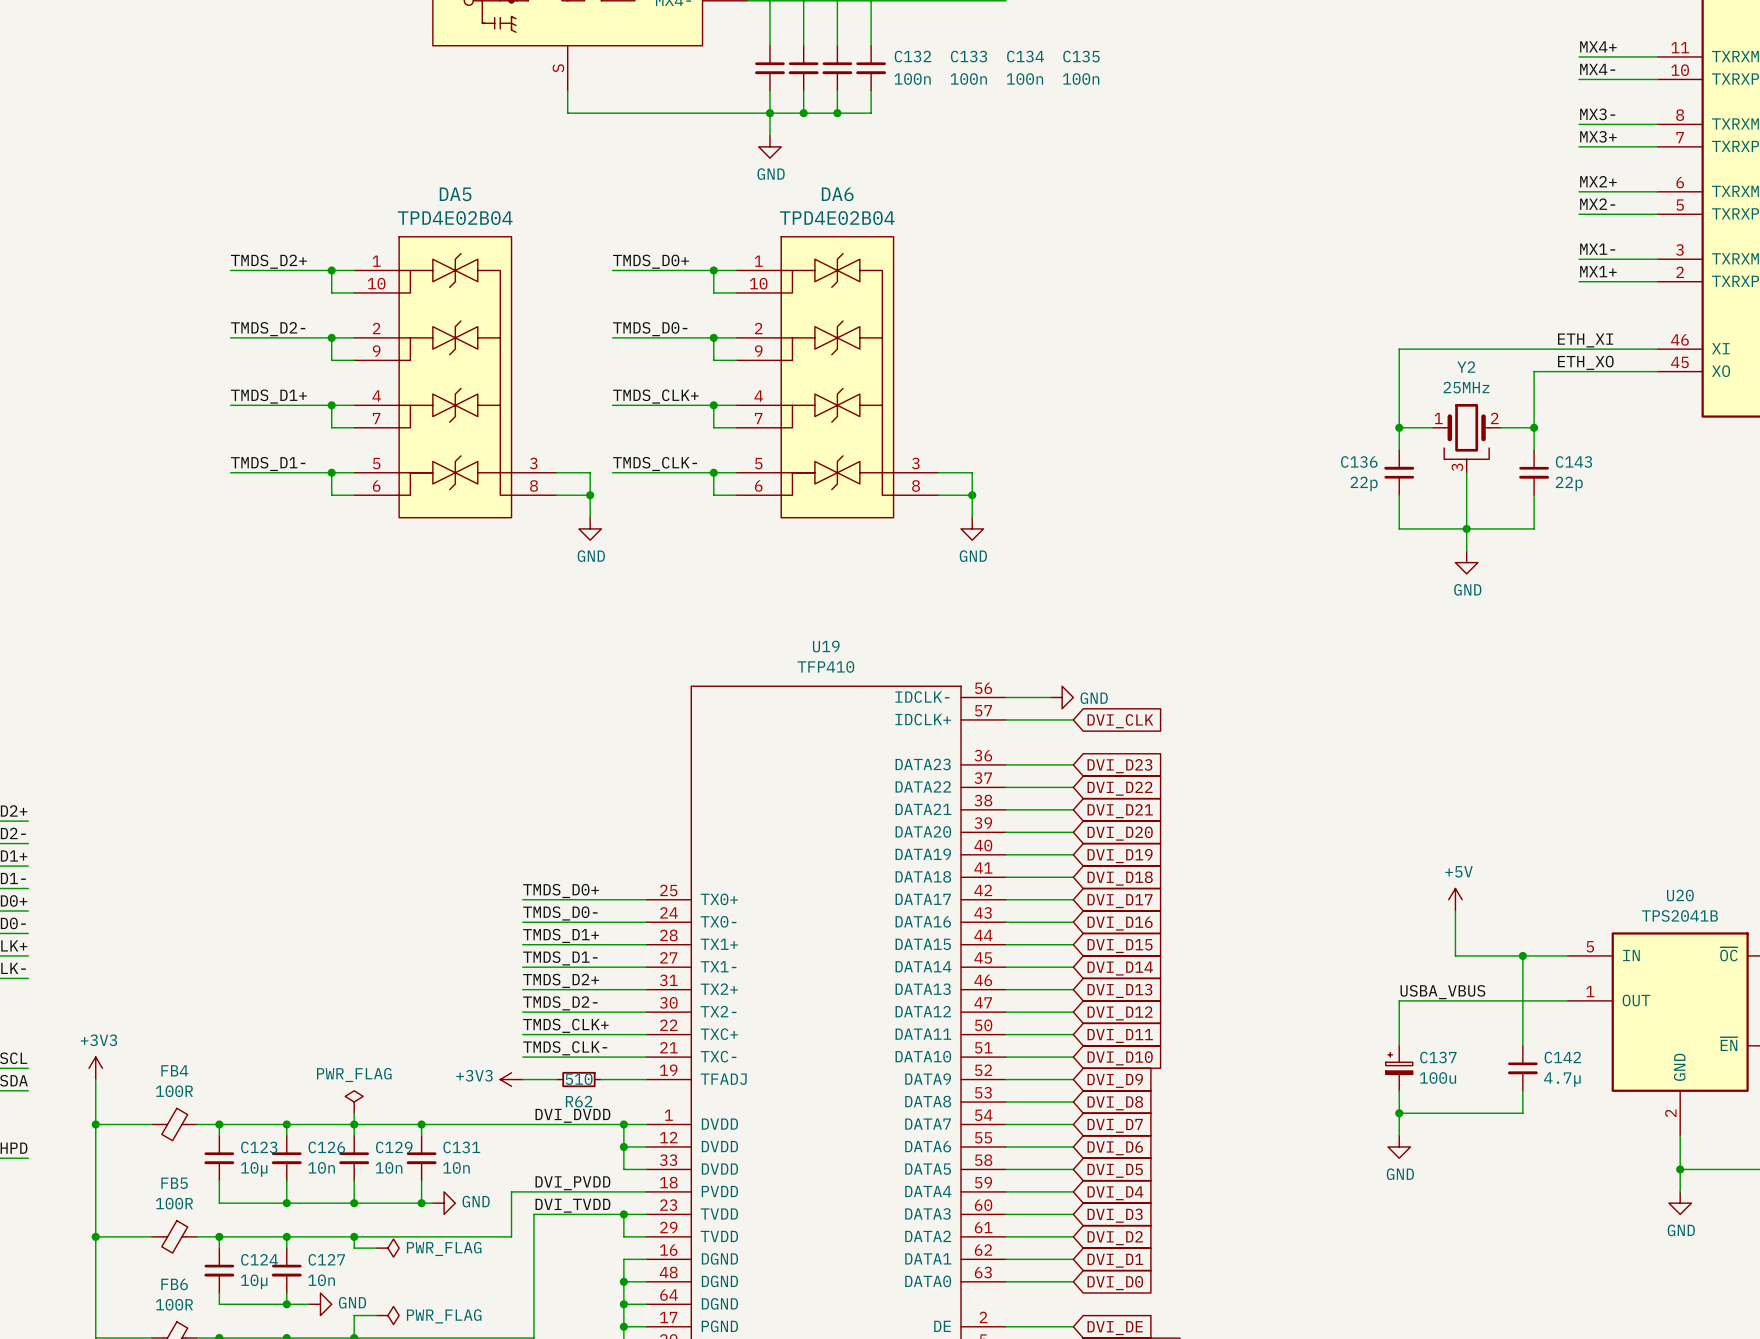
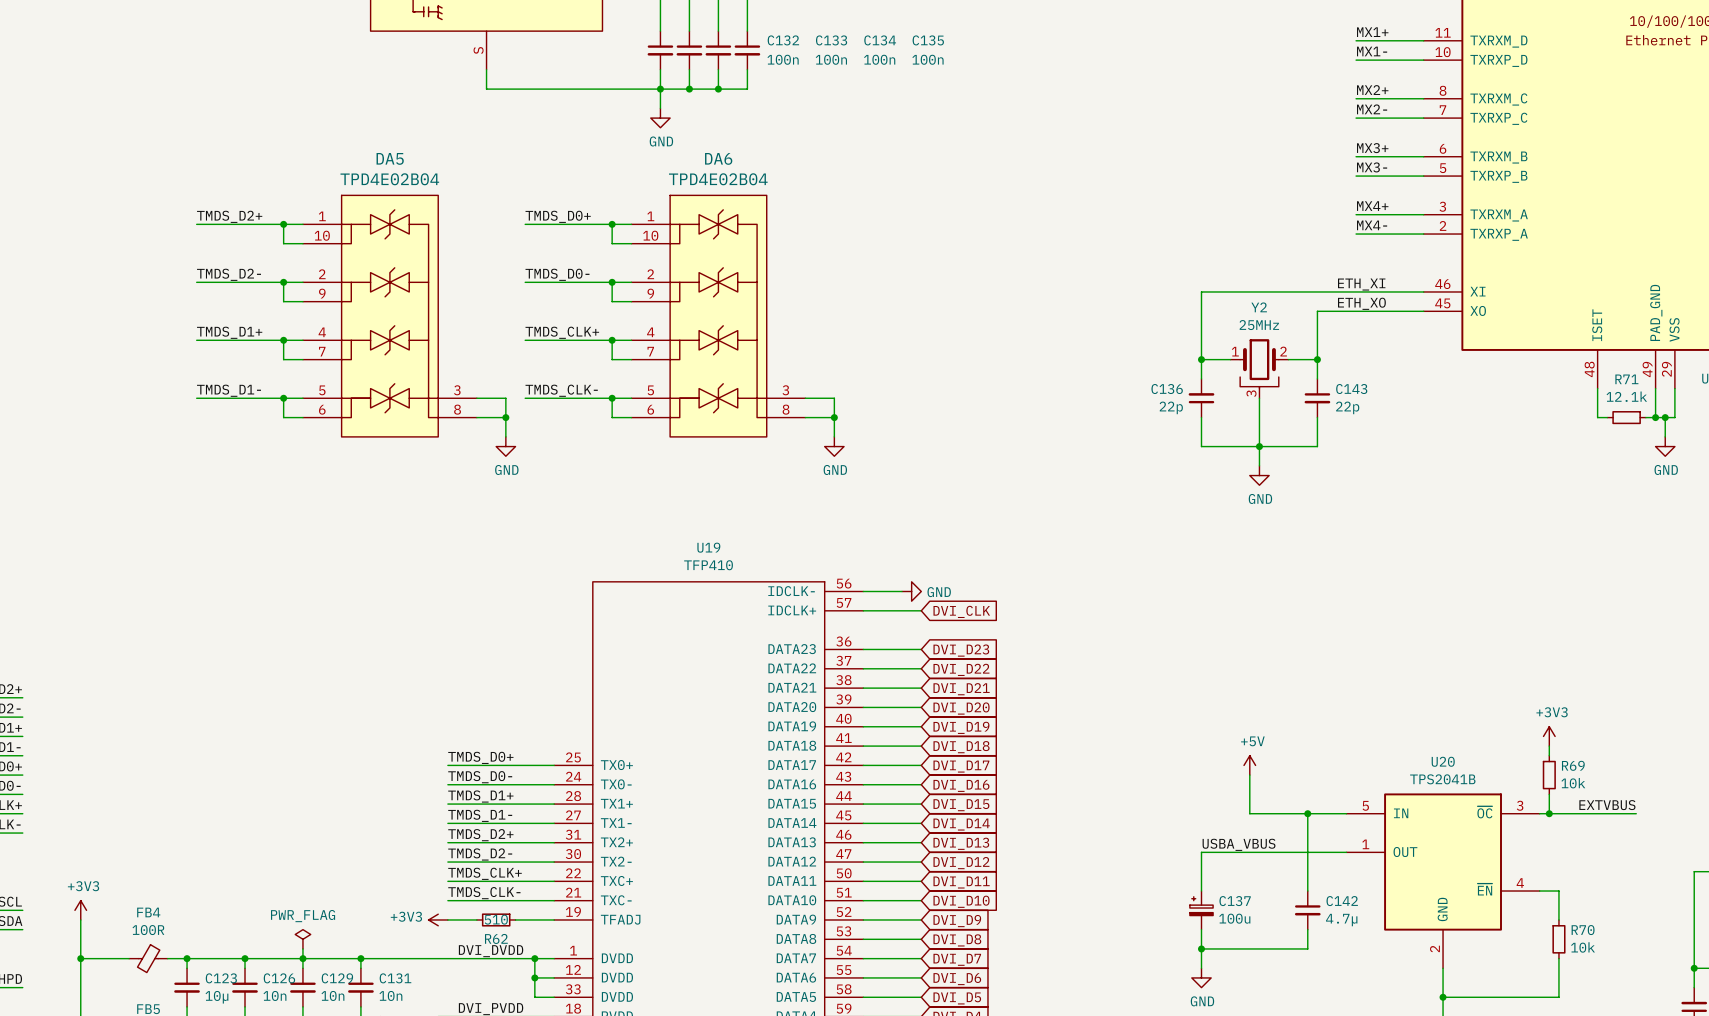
label: MX4+ (1598, 46) -> MX1+ (1372, 32)
label: MX4- (1597, 69) -> MX1- (1372, 51)
label: MX3- (1597, 114) -> MX2+ (1372, 90)
label: MX3+ (1598, 136) -> MX2- (1372, 109)
label: MX2+ (1598, 181) -> MX3+ (1372, 148)
label: MX2- (1597, 204) -> MX3- (1372, 167)
label: MX1- (1597, 249) -> MX4+ (1372, 206)
label: MX1+ (1598, 271) -> MX4- (1372, 225)

